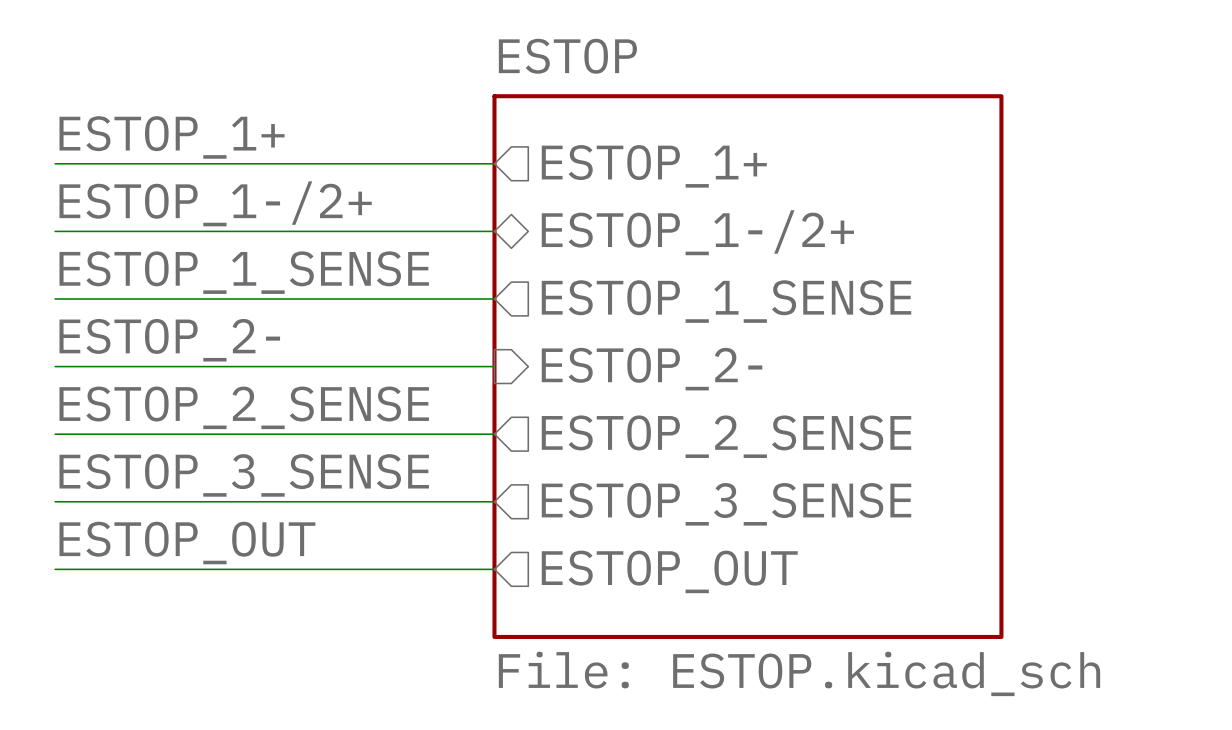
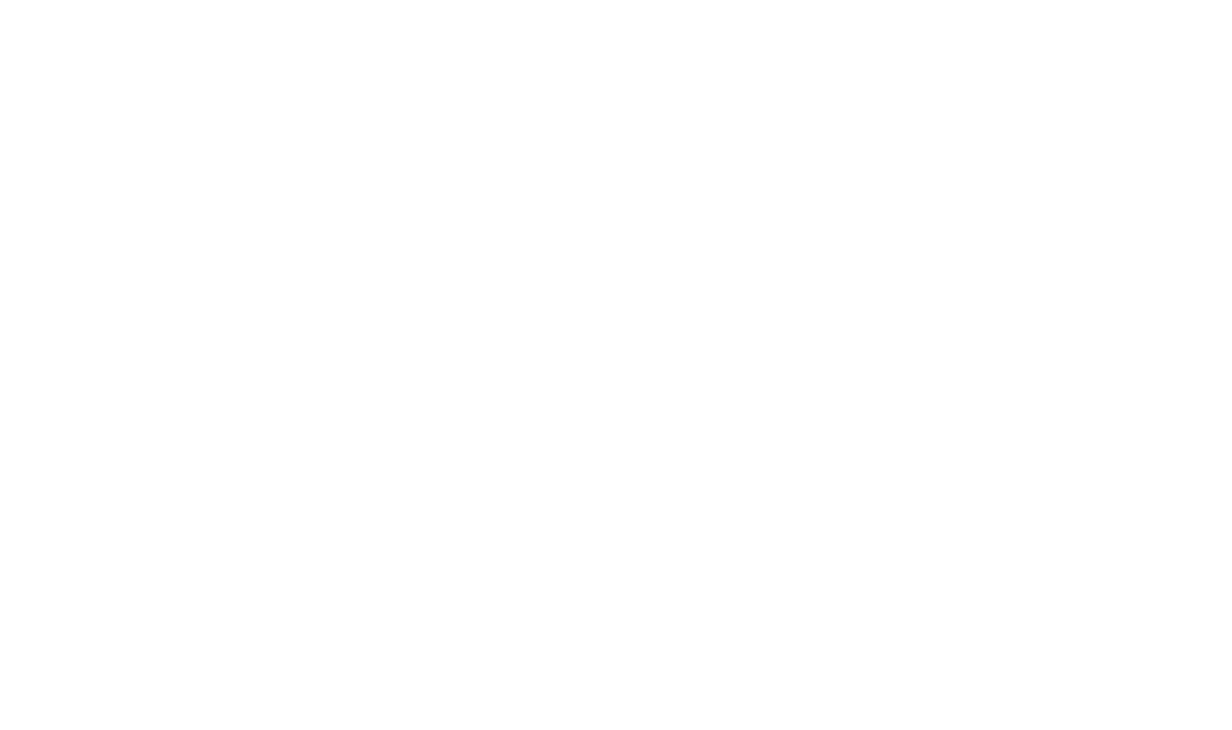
label: ESTOP_1+ (172, 137) -> none
wire: (55, 163) (494, 163) -> none
sheet pin: ESTOP_1+ (654, 166) -> none
label: ESTOP_1-/2+ (215, 203) -> none
wire: (55, 231) (494, 231) -> none
sheet pin: ESTOP_1-/2+ (697, 232) -> none
label: ESTOP_1_SENSE (244, 272) -> none
wire: (55, 299) (494, 299) -> none
sheet pin: ESTOP_1_SENSE (726, 301) -> none
label: ESTOP_2- (169, 340) -> none
wire: (55, 366) (494, 366) -> none
sheet ESTOP: File: ESTOP.kicad_sch (747, 366) -> none
sheet pin: ESTOP_2- (652, 369) -> none
label: ESTOP_2_SENSE (244, 407) -> none
wire: (55, 434) (494, 434) -> none
sheet pin: ESTOP_2_SENSE (726, 436) -> none
label: ESTOP_3_SENSE (244, 475) -> none
wire: (55, 501) (494, 501) -> none
sheet pin: ESTOP_3_SENSE (726, 504) -> none
label: ESTOP_OUT (187, 543) -> none
wire: (55, 569) (494, 569) -> none
sheet pin: ESTOP_OUT (669, 571) -> none

